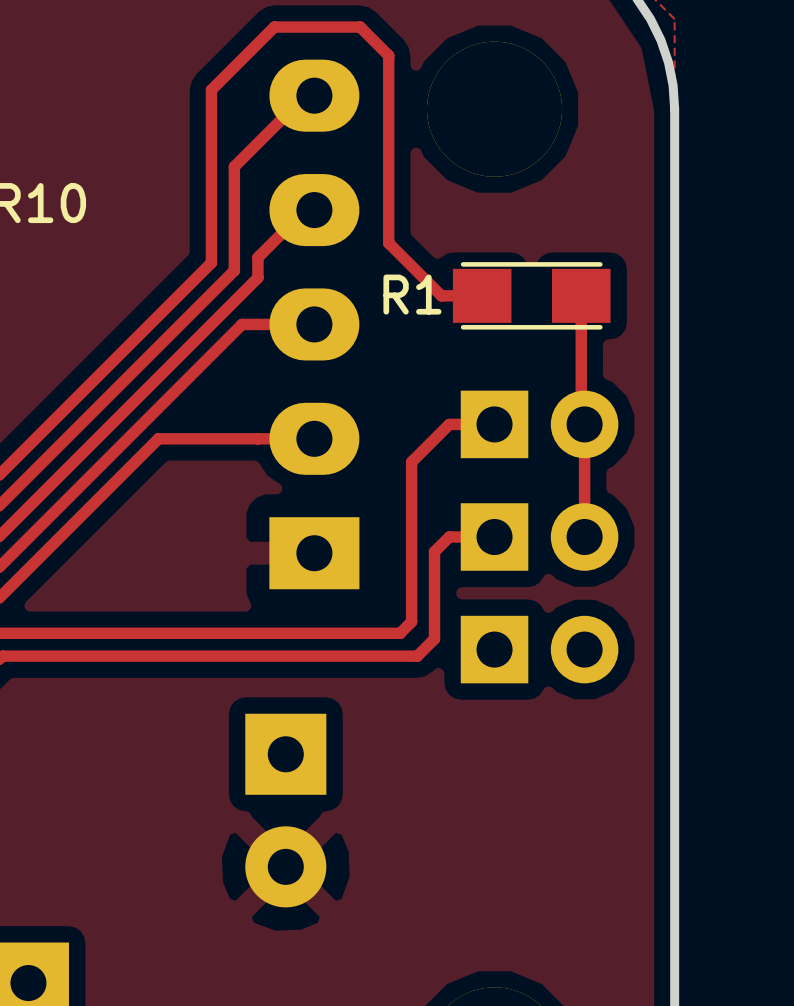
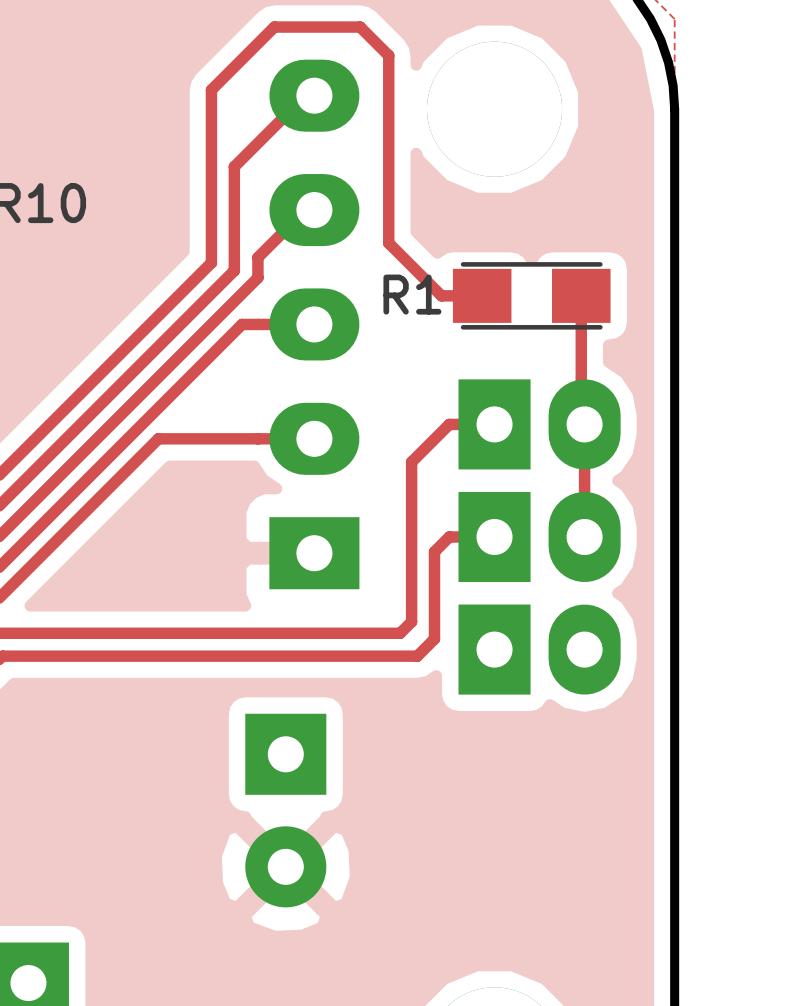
part footprint: [460, 390, 619, 459] -> [458, 379, 621, 470]
part footprint: [460, 503, 619, 571] -> [458, 491, 621, 583]
part footprint: [460, 615, 619, 684] -> [458, 604, 621, 695]

